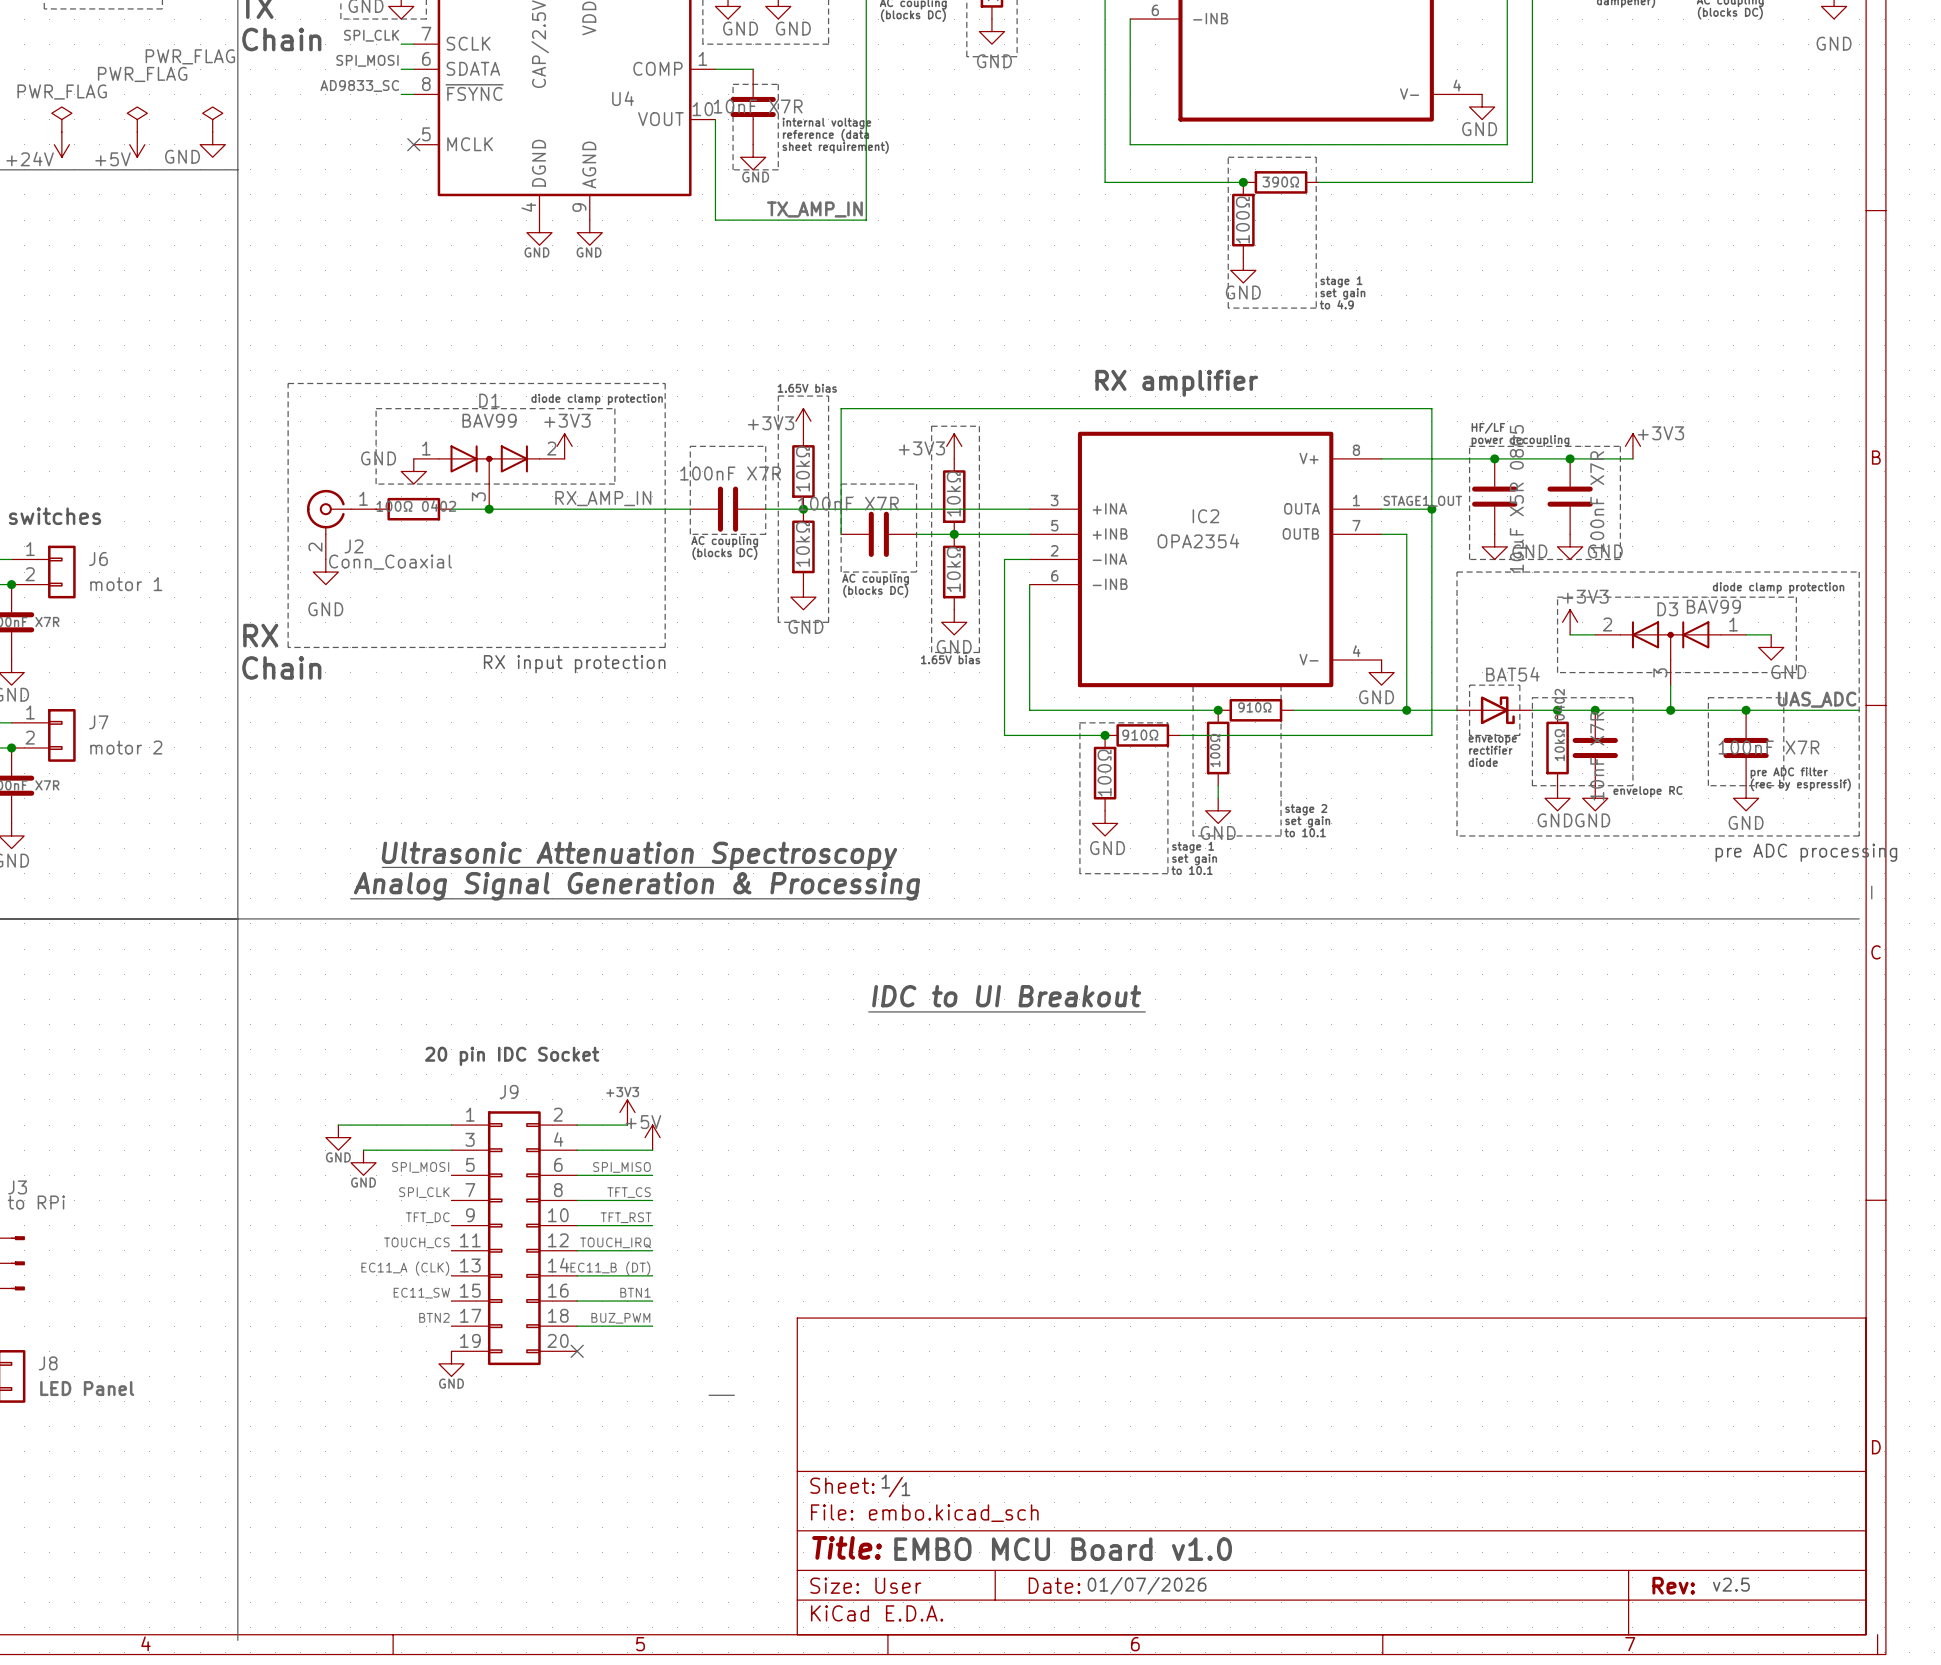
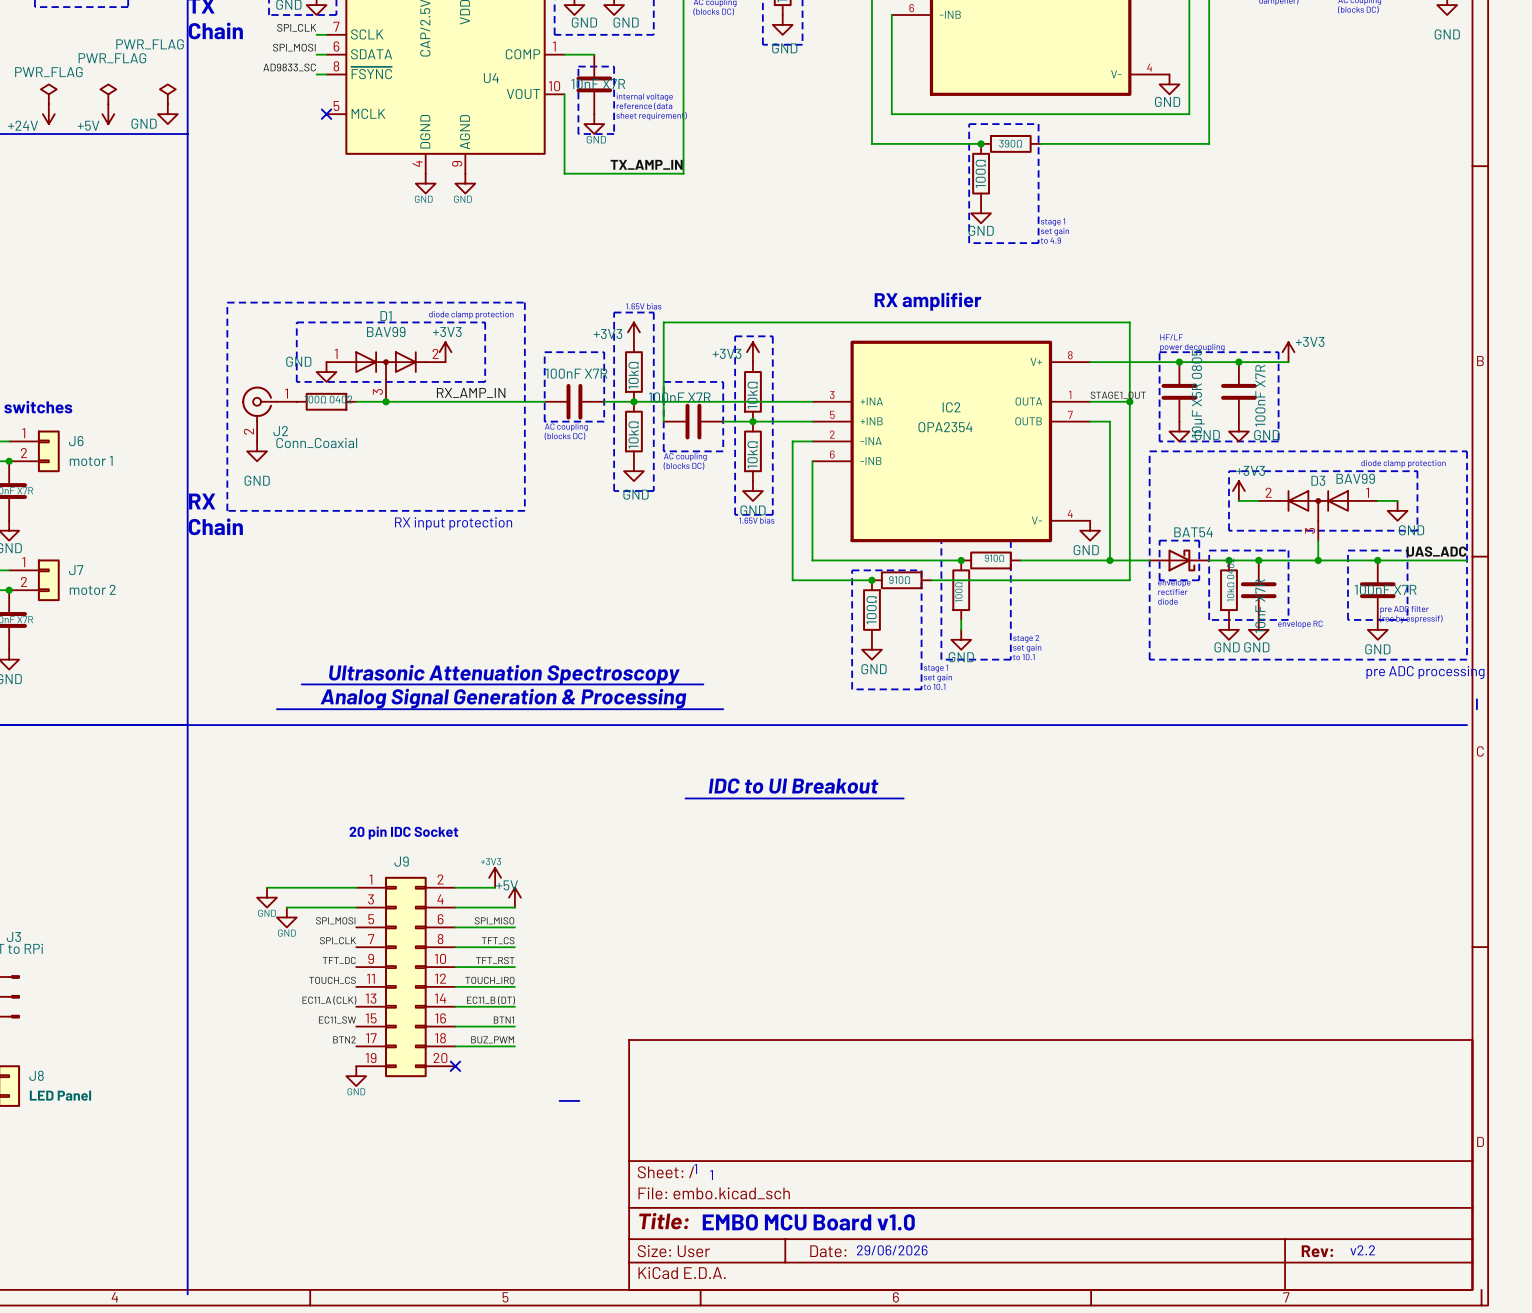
text: v2.5 (1731, 1584) -> v2.2 (1362, 1250)
text: 01/07/2026 (1147, 1585) -> 29/06/2026 (892, 1250)

